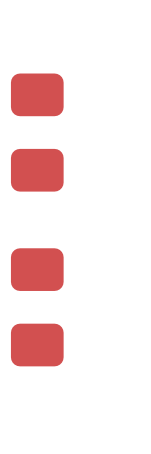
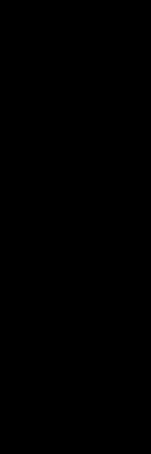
part: (37, 132) -> none
part: (37, 307) -> none

